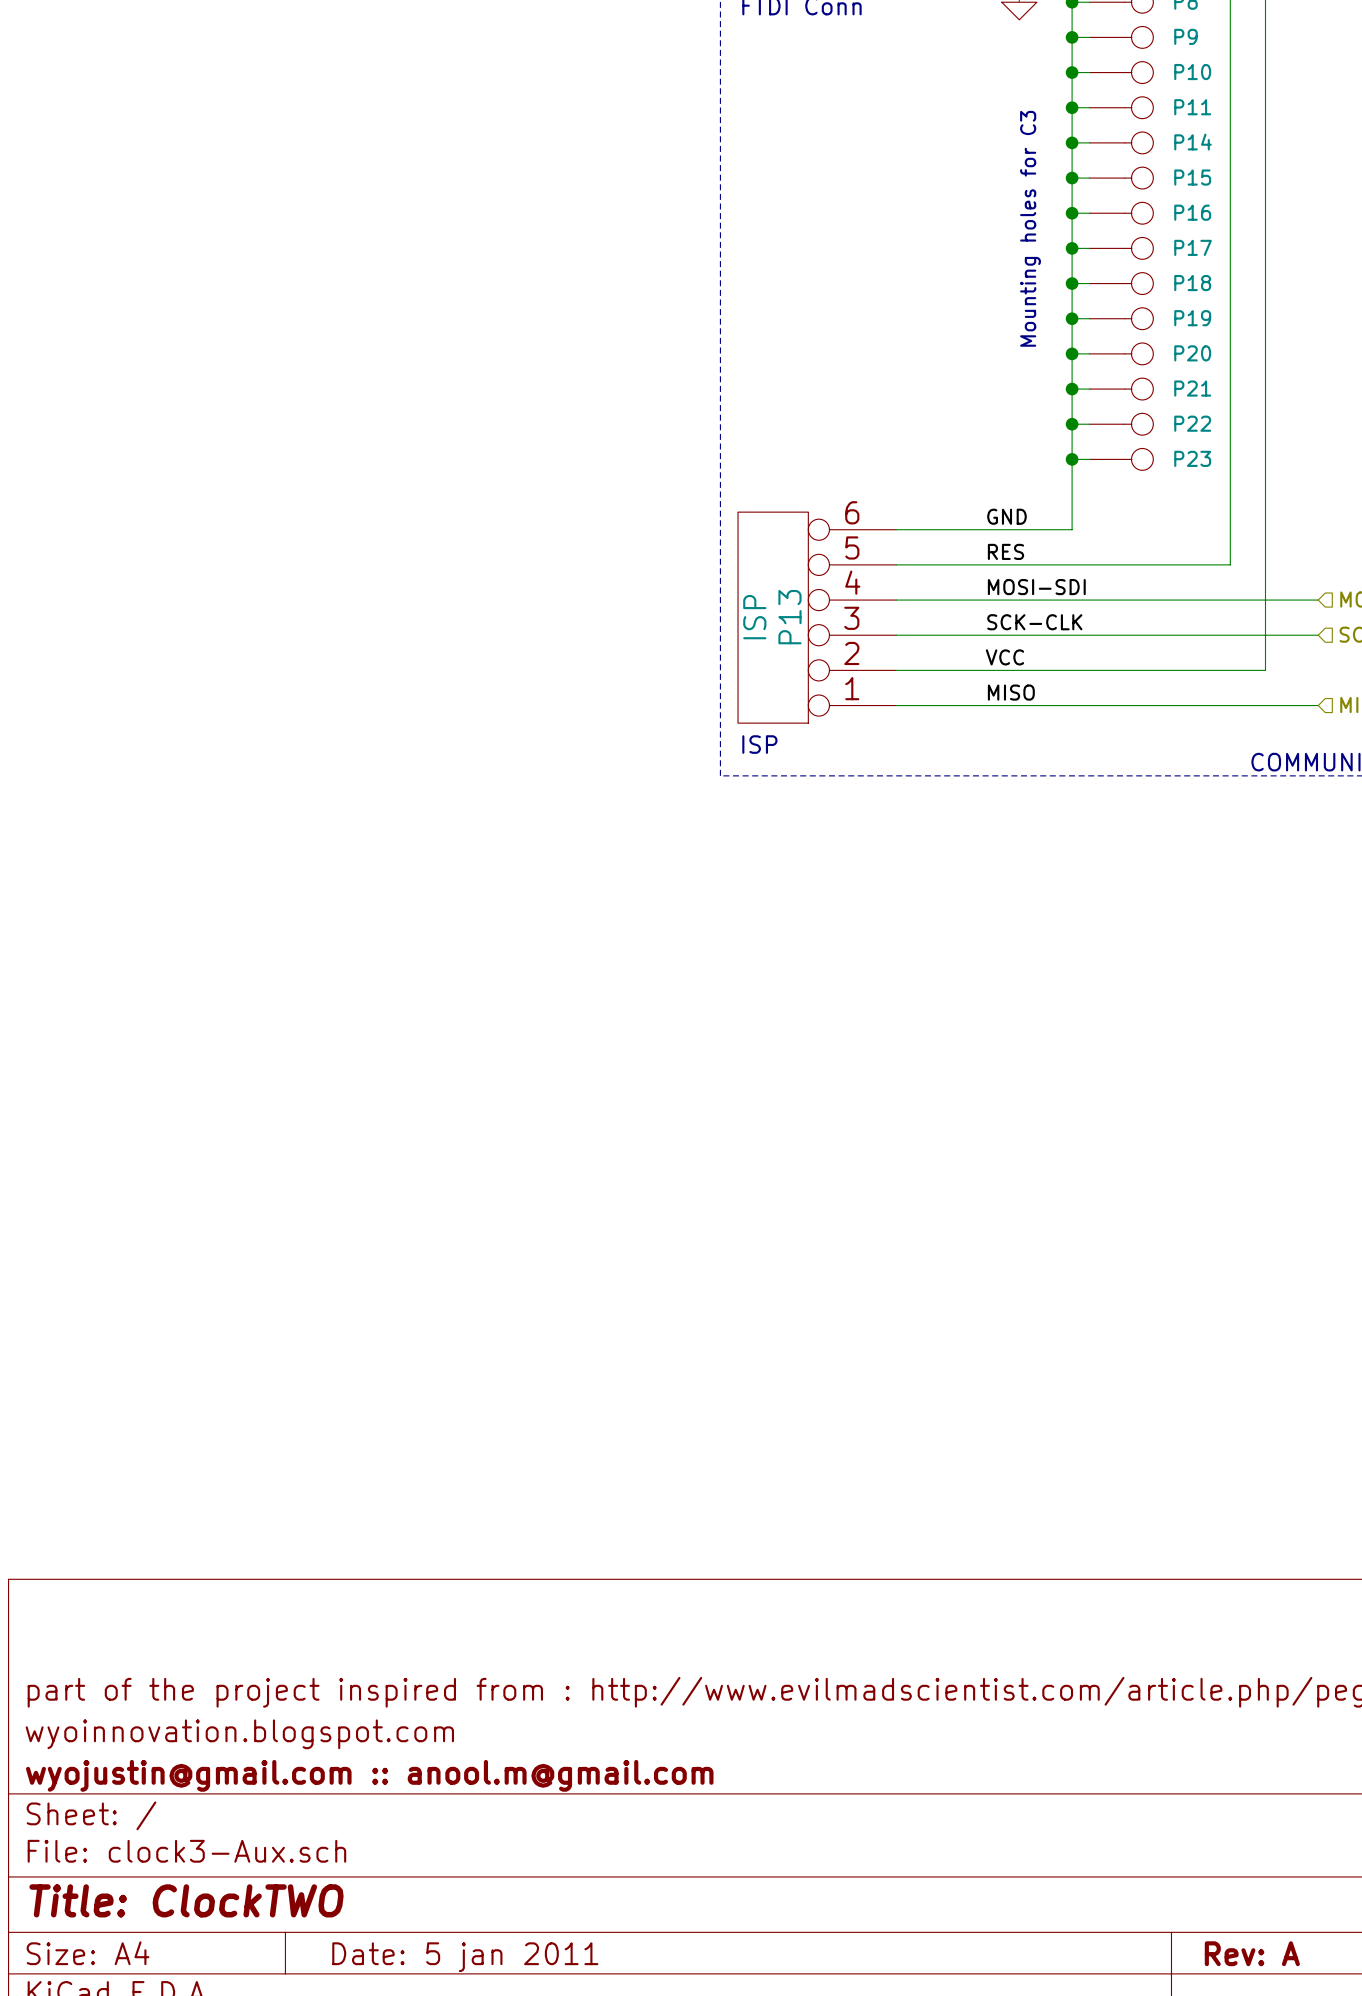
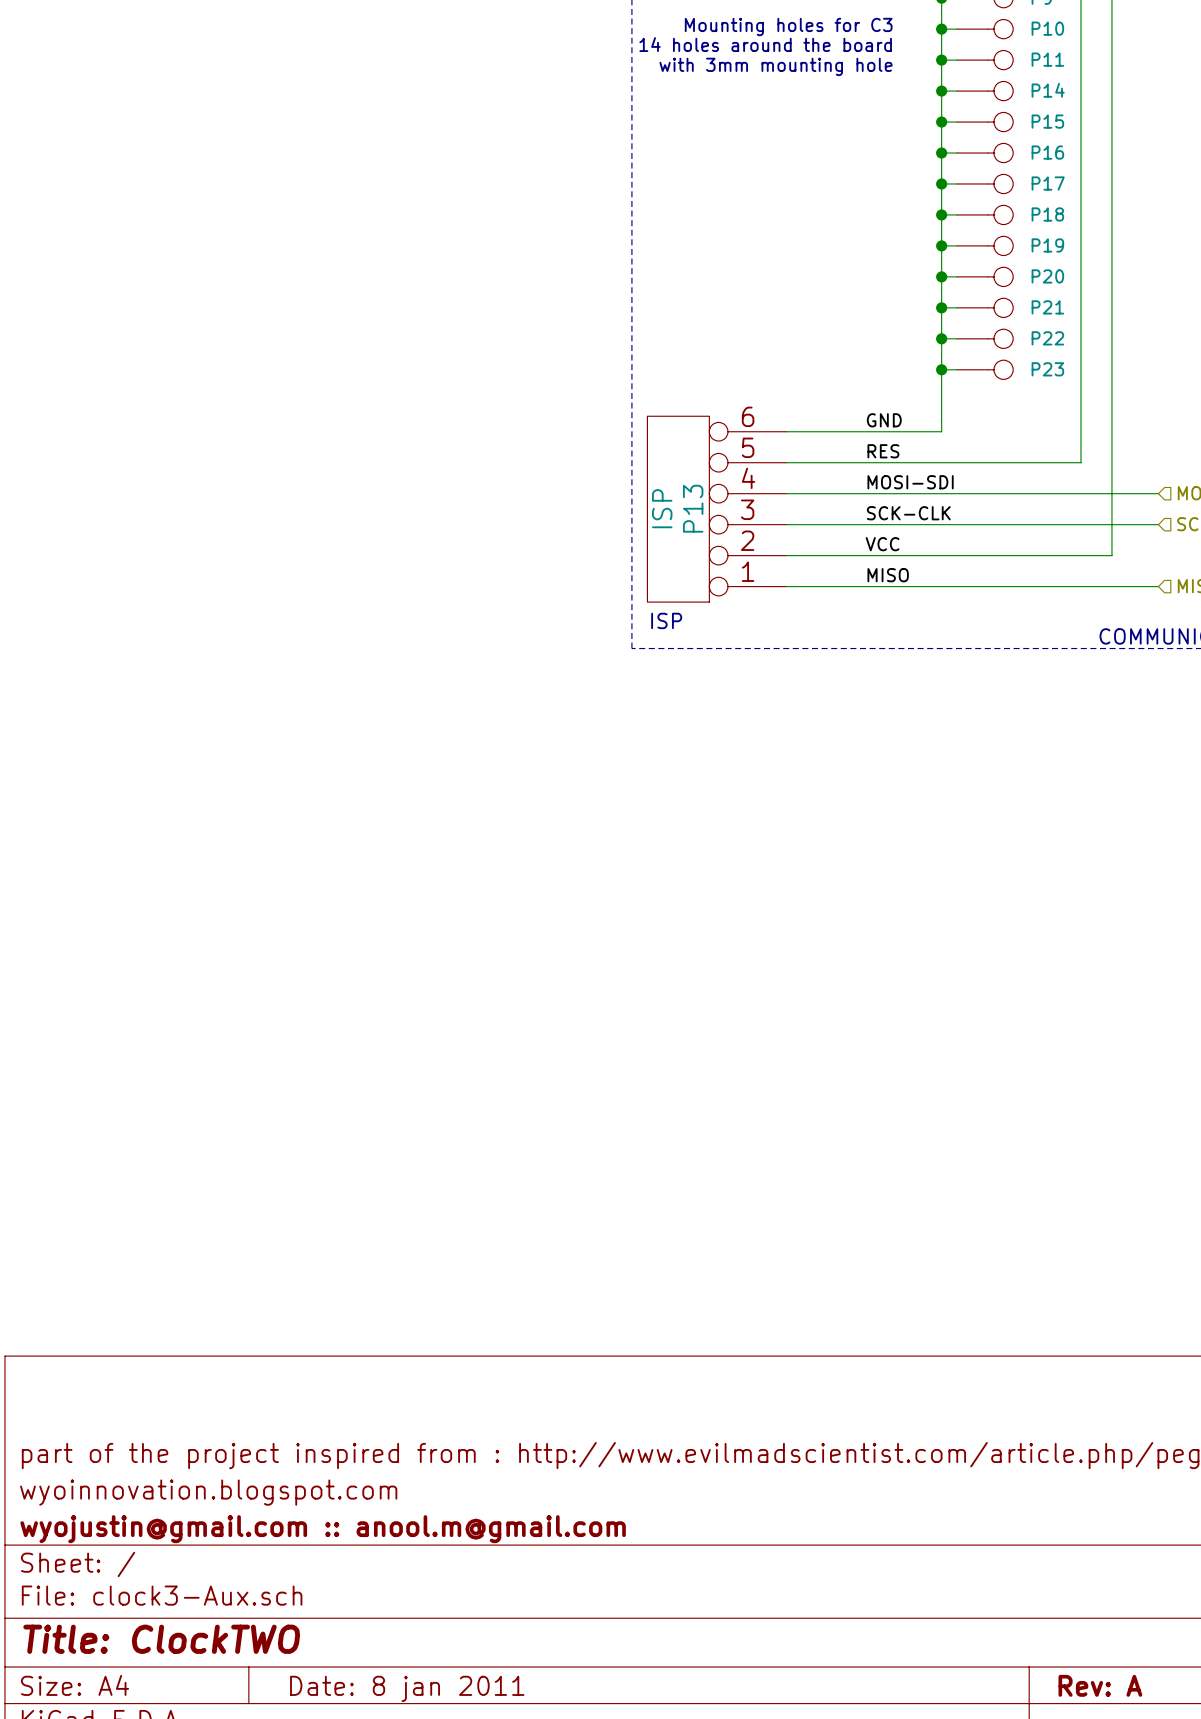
text: none -> 14 holes around the board (765, 44)
text: none -> with 3mm mounting hole (775, 66)
text rotation: 0° (1030, 228) -> 90° clockwise (788, 27)
title block: Date: 5 jan 2011 (465, 1957) -> Date: 8 jan 2011 (407, 1688)

